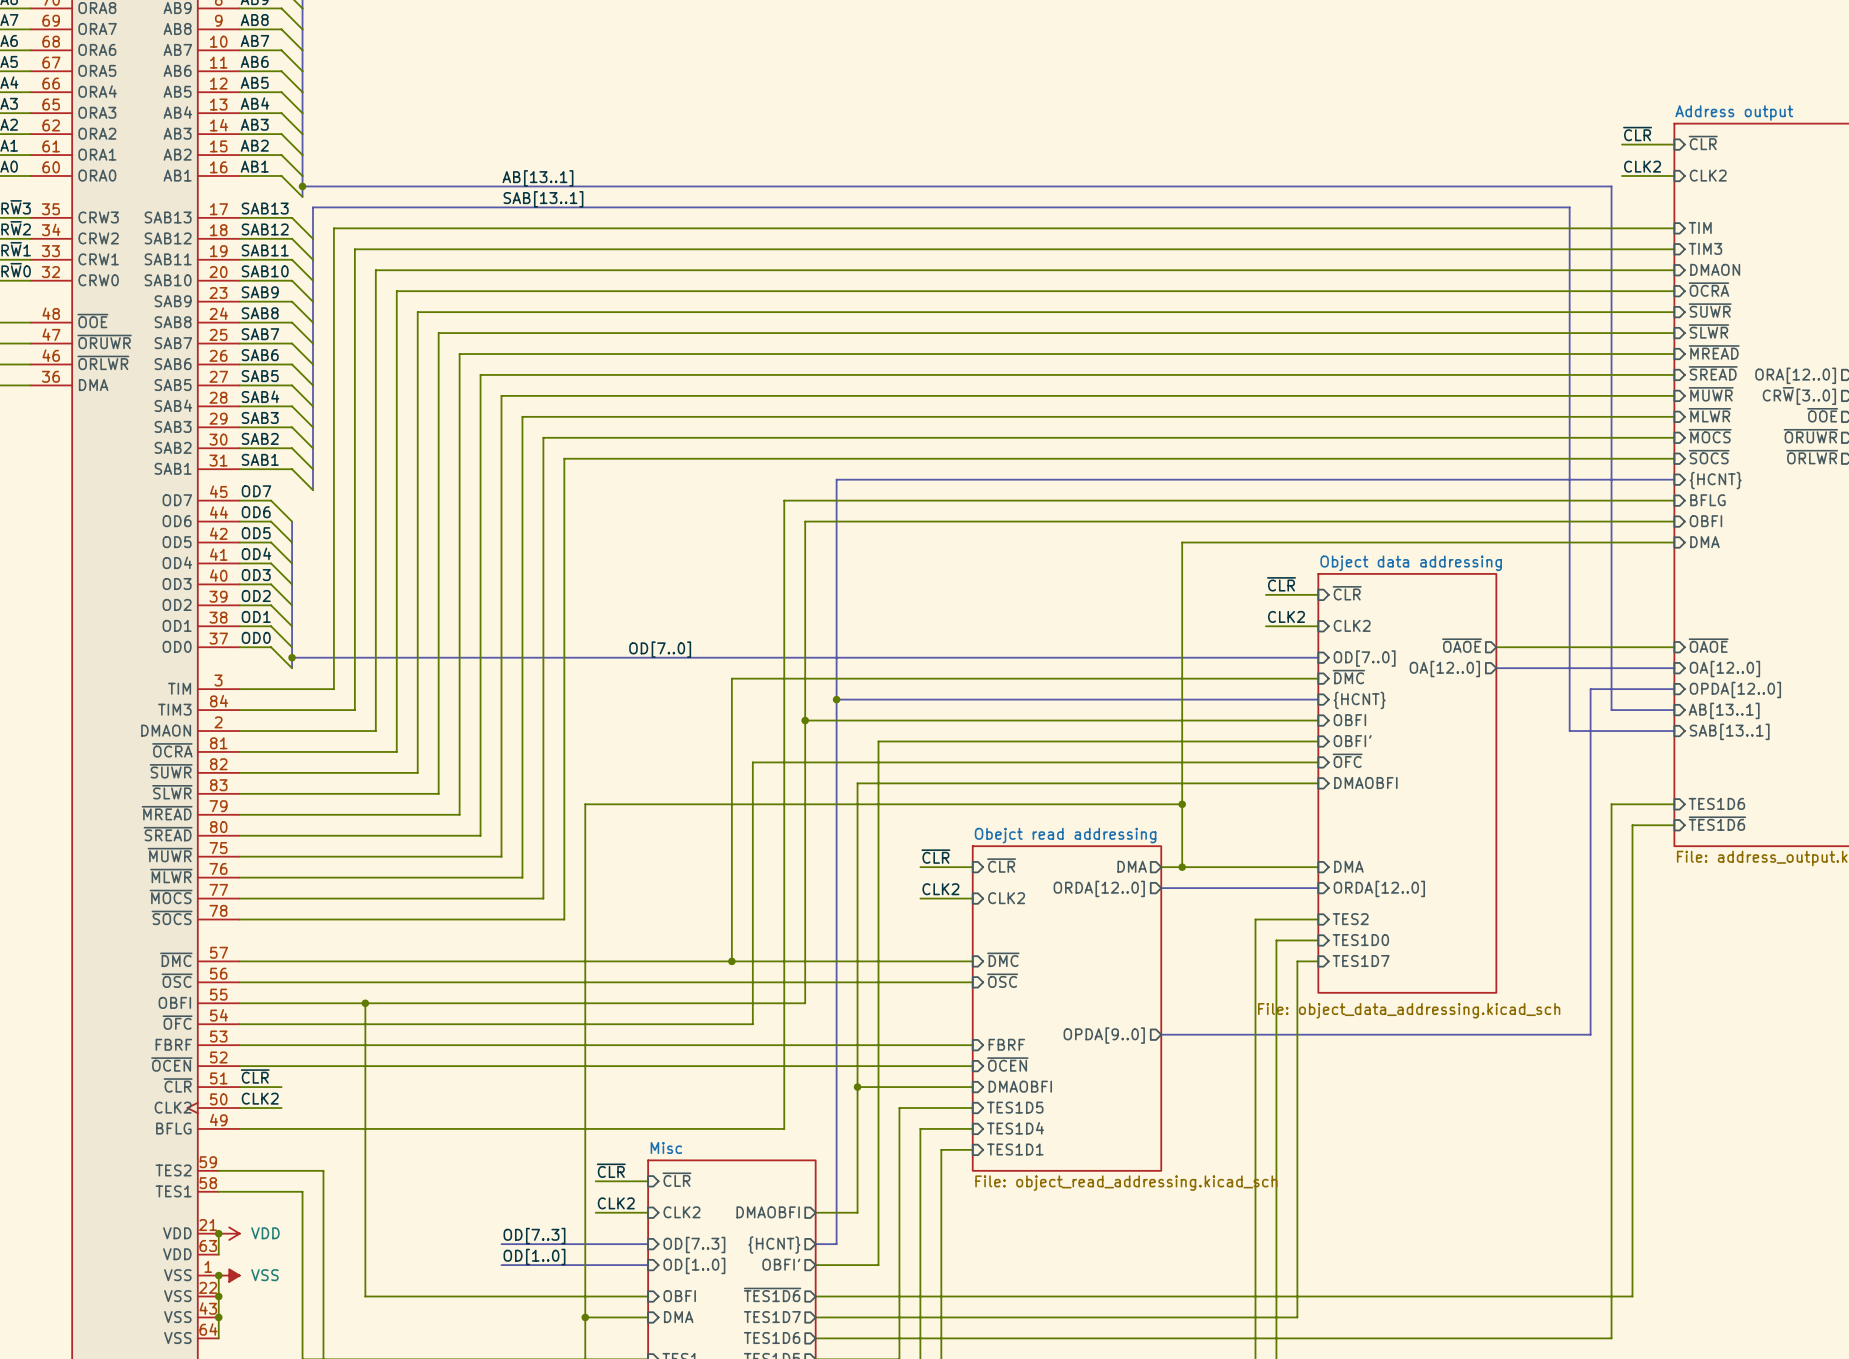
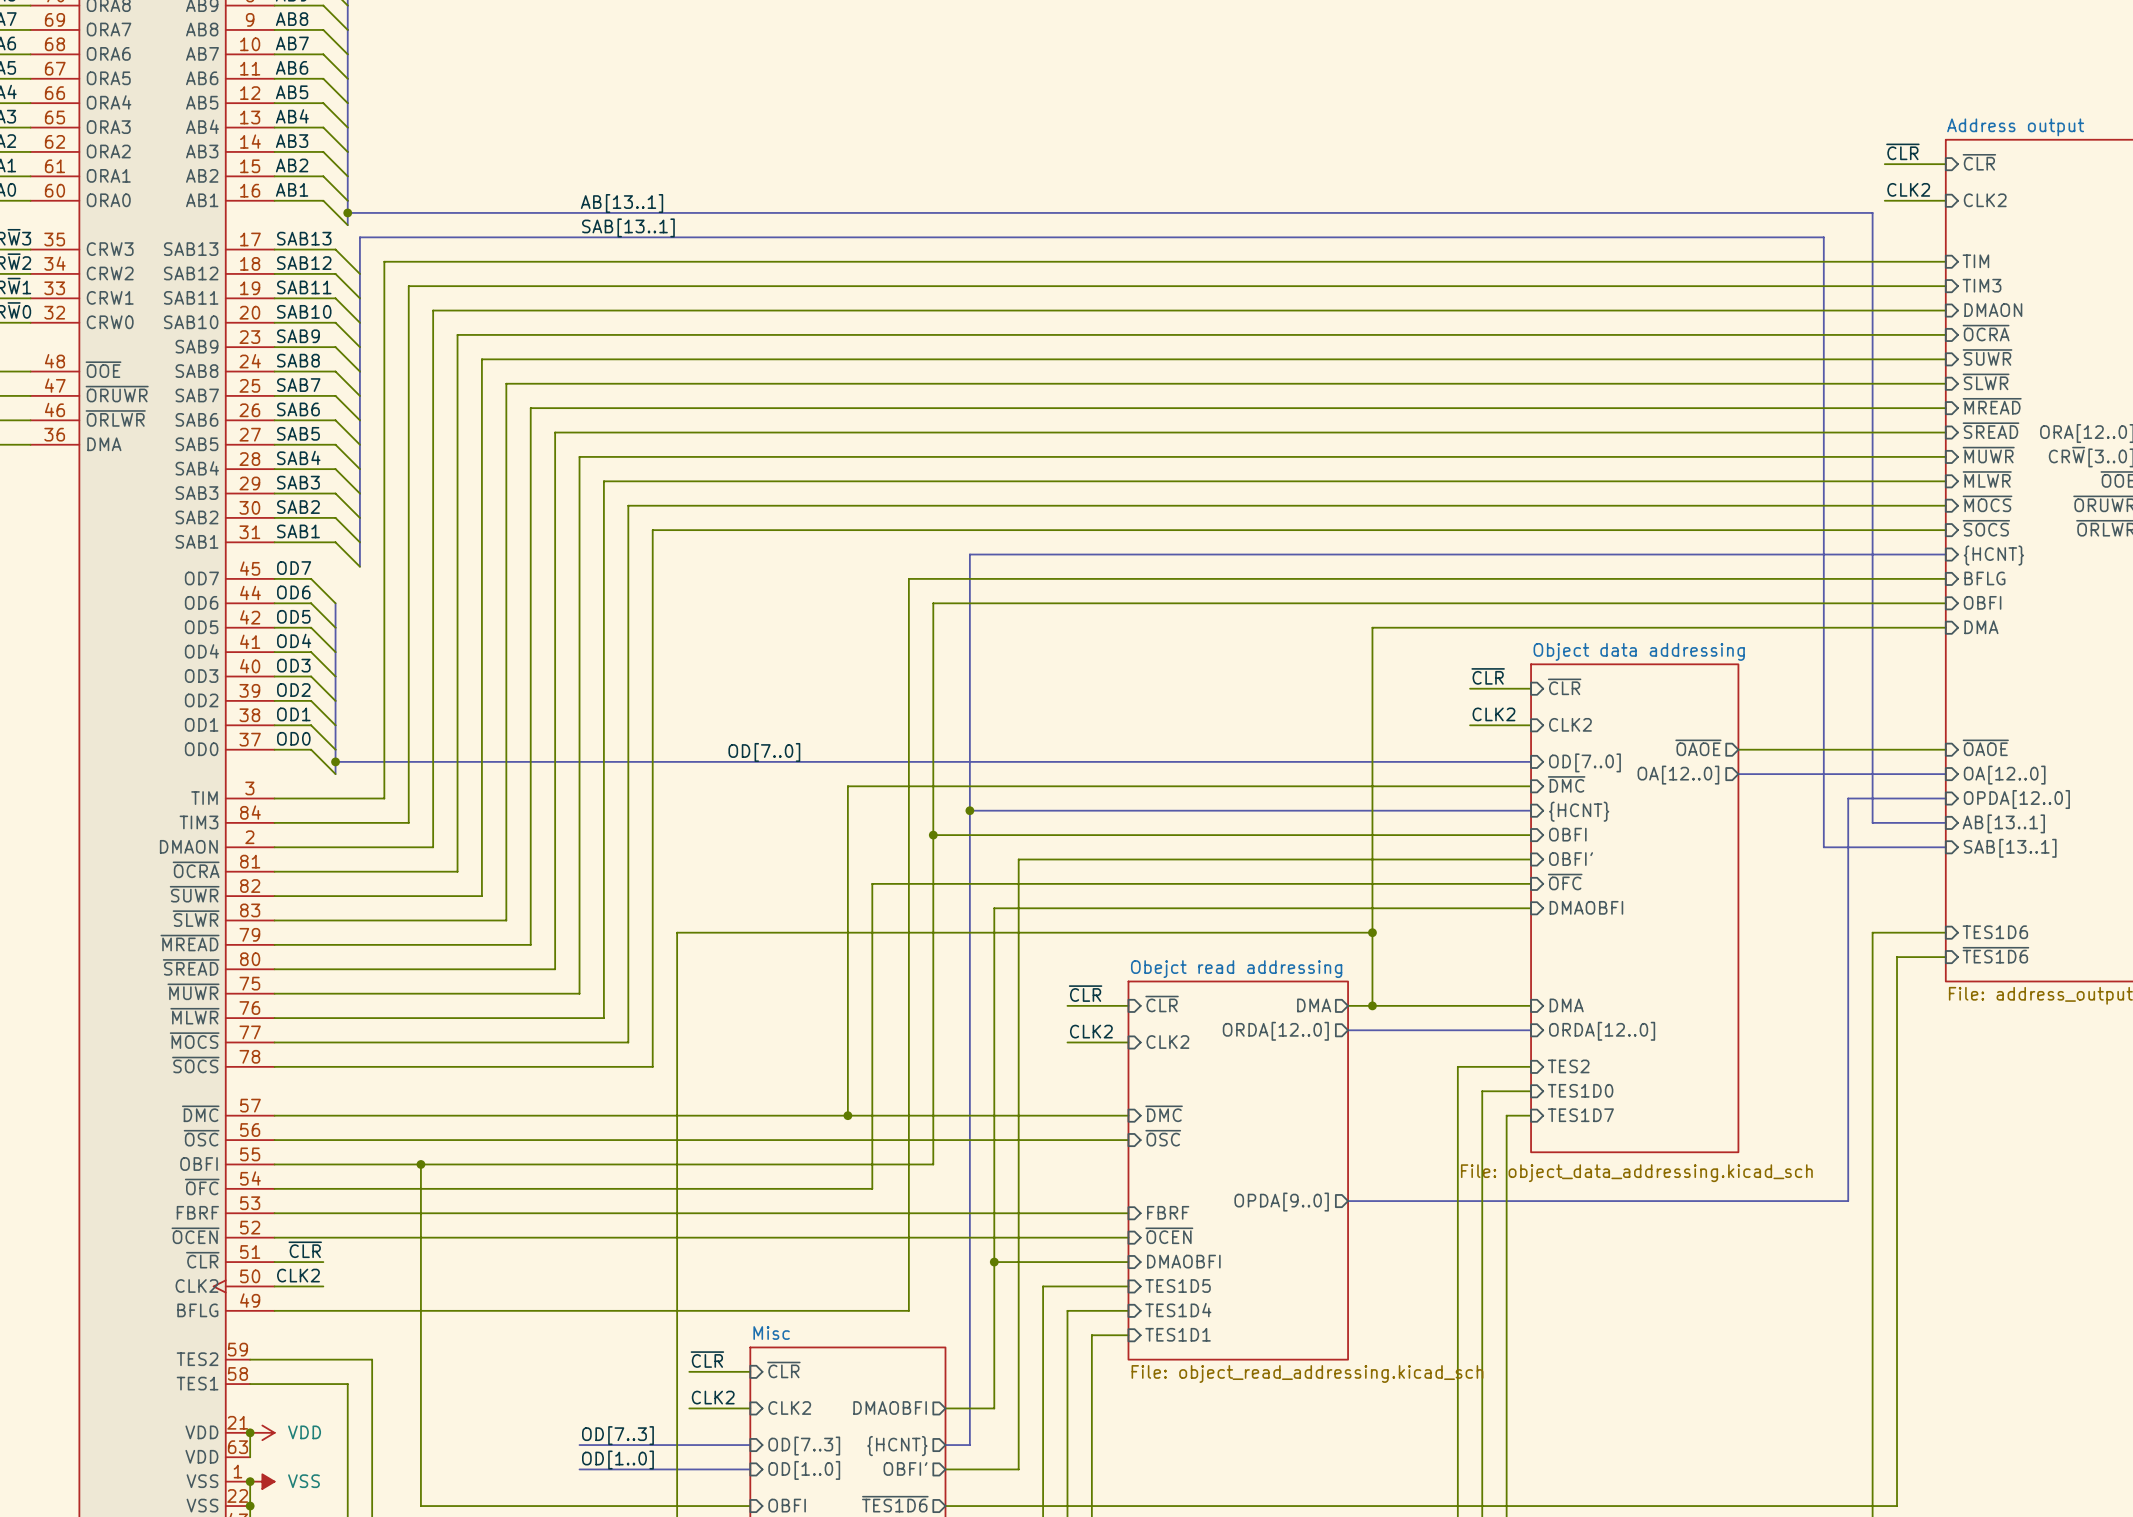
label position: ~{CLR} (255, 1076) -> ~{CLR} (305, 1249)

